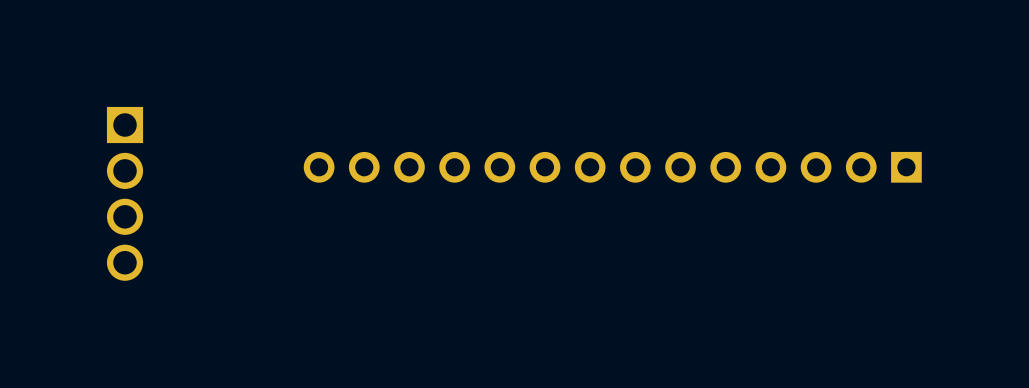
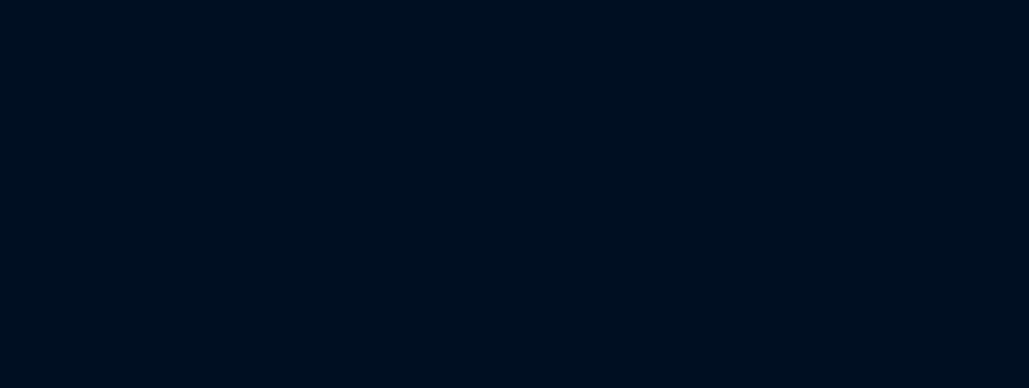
part: (612, 167) -> none
part: (125, 193) -> none

